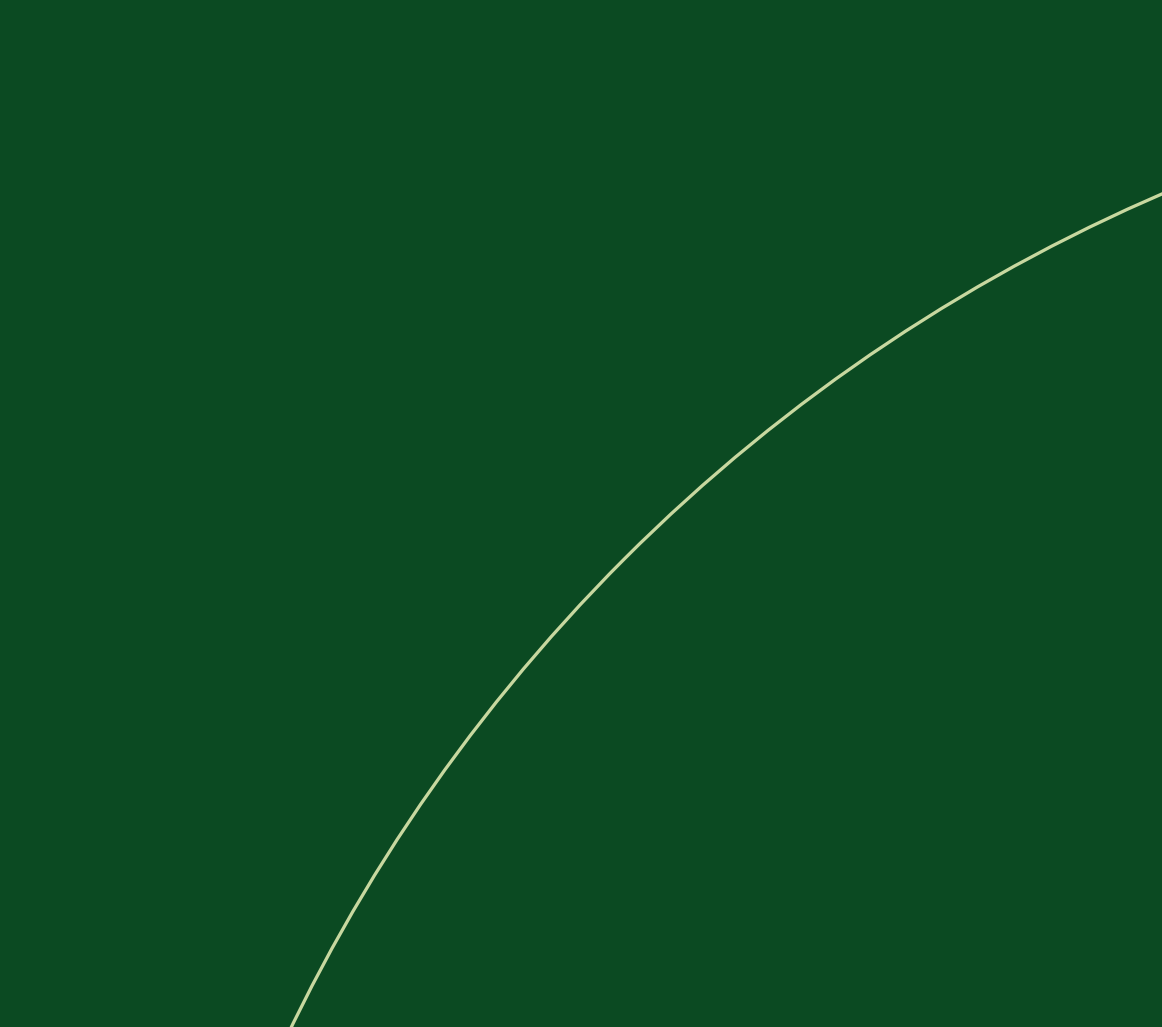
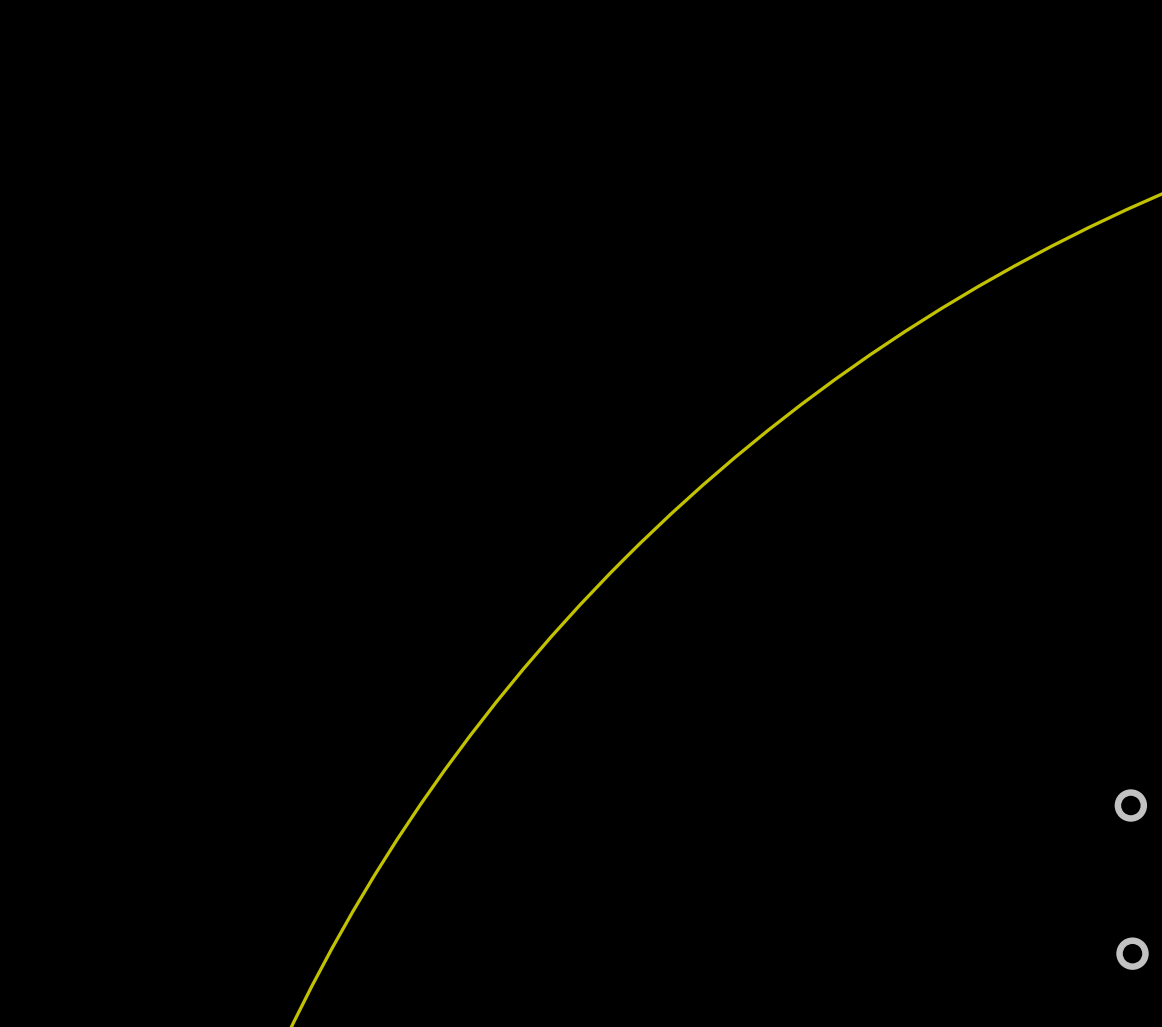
via: none -> (1130, 805)
via: none -> (1132, 953)

